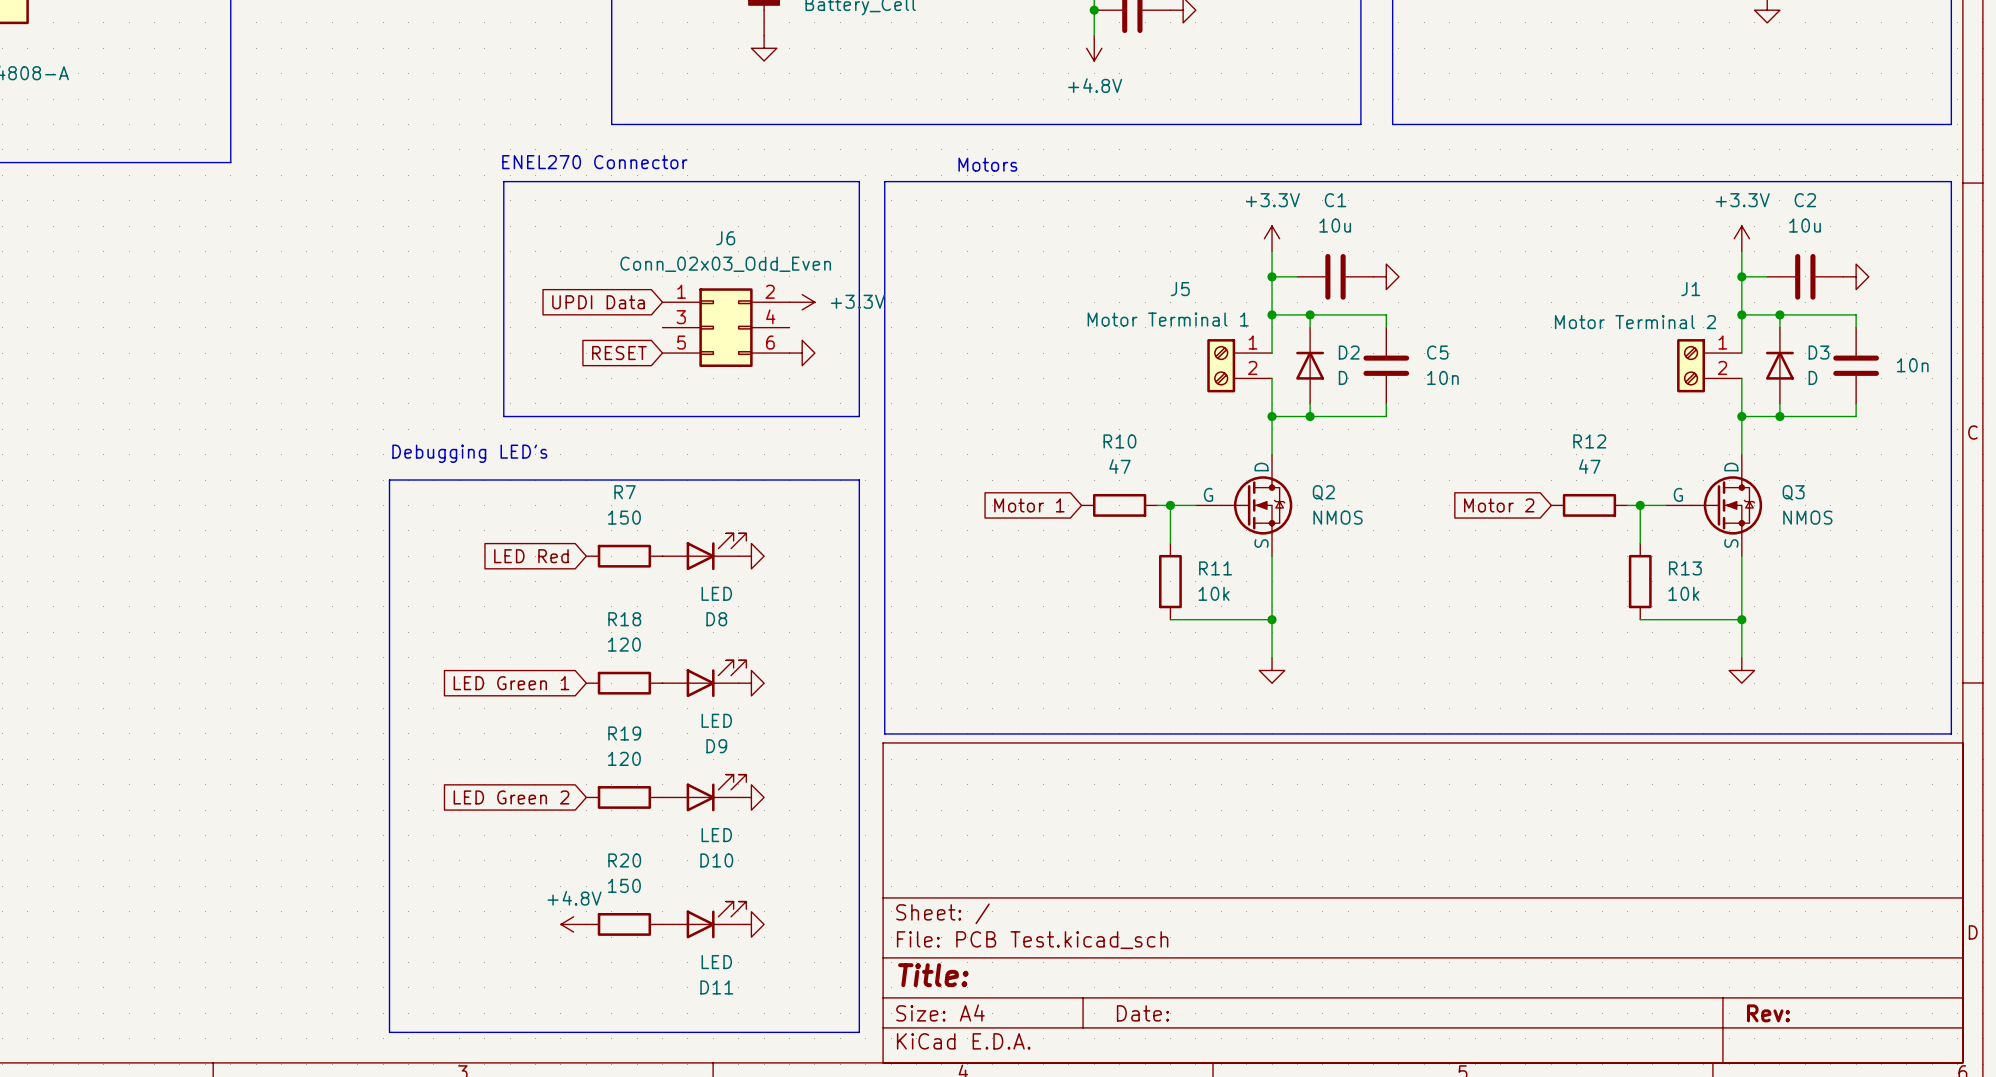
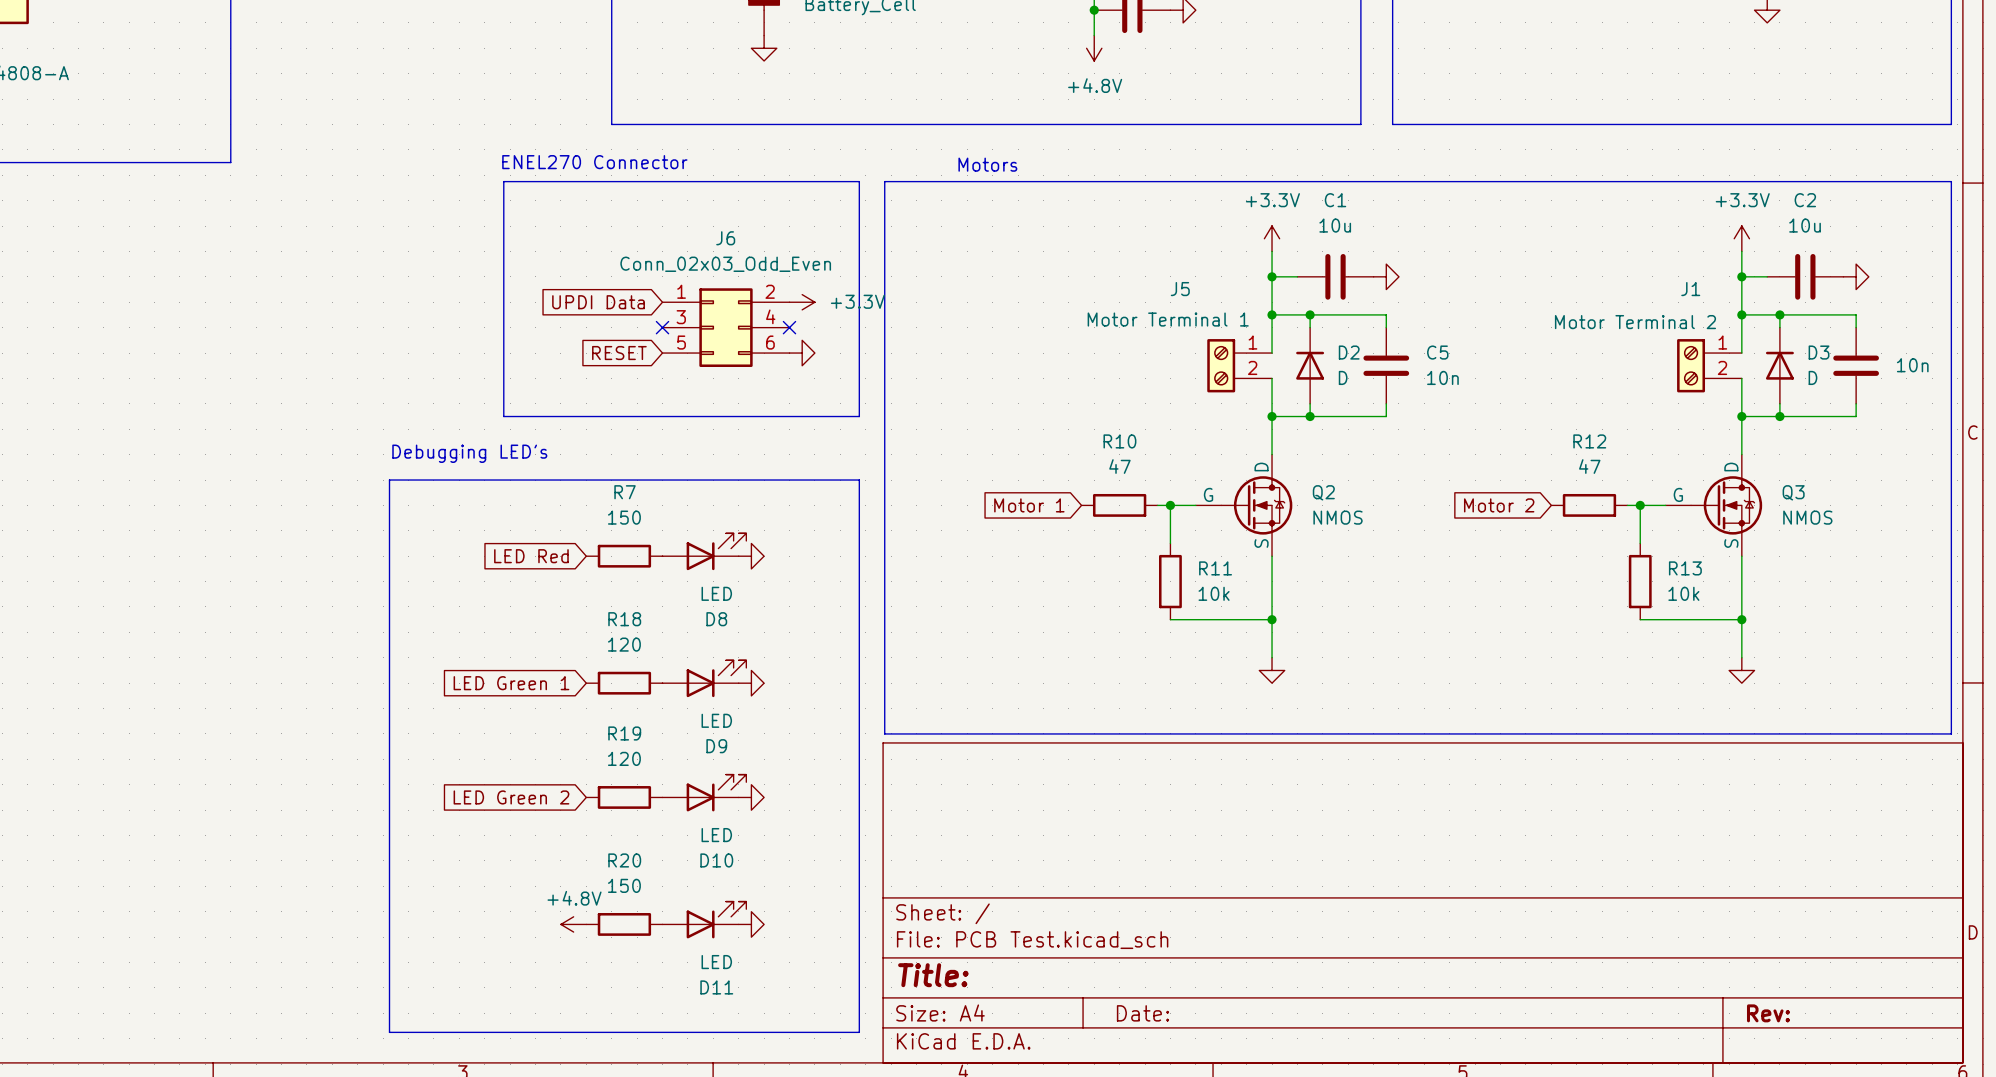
no-connect mark: none -> (662, 327)
no-connect mark: none -> (789, 327)

